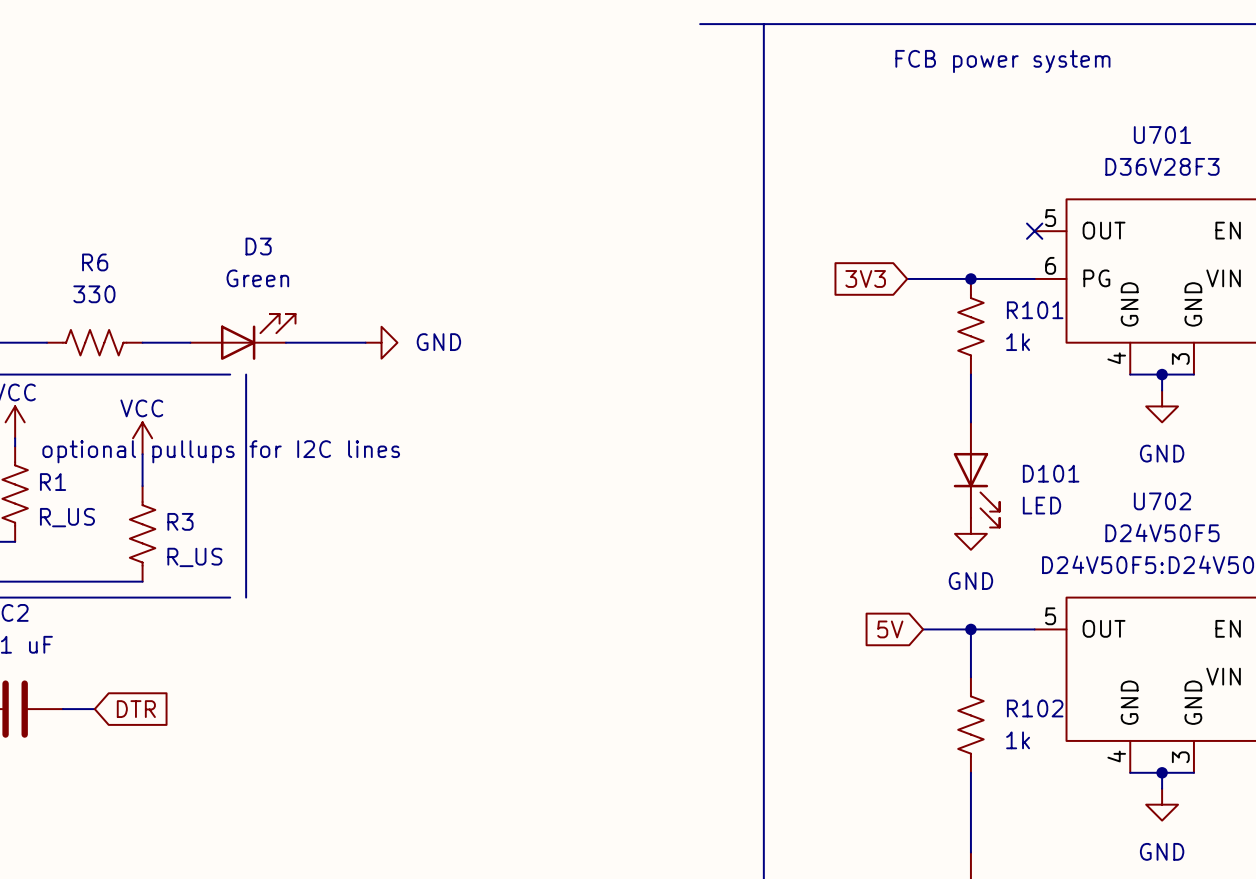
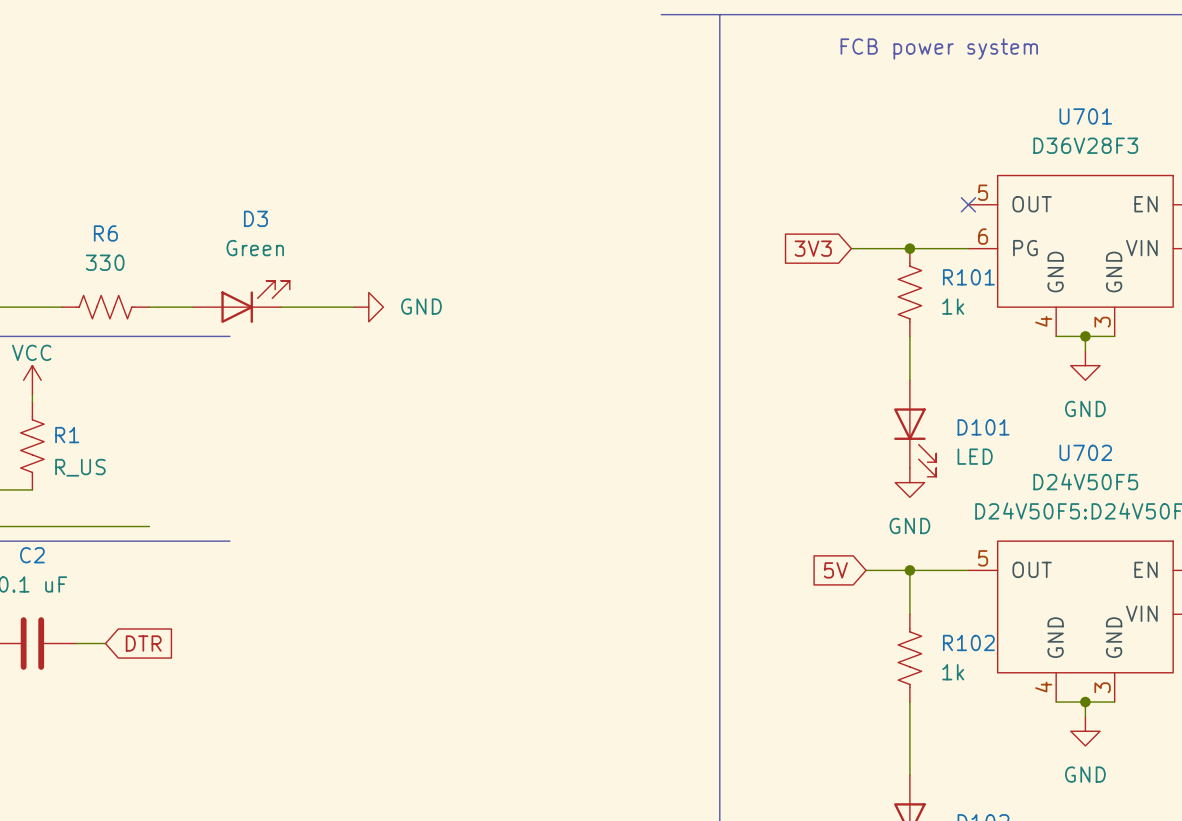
line: (246, 374) (246, 597) -> none
power symbol: VCC (142, 438) -> none
text: optional pullups for I2C lines (221, 451) -> none
wire: (142, 454) (142, 486) -> none
R3: R_US (142, 533) -> none

